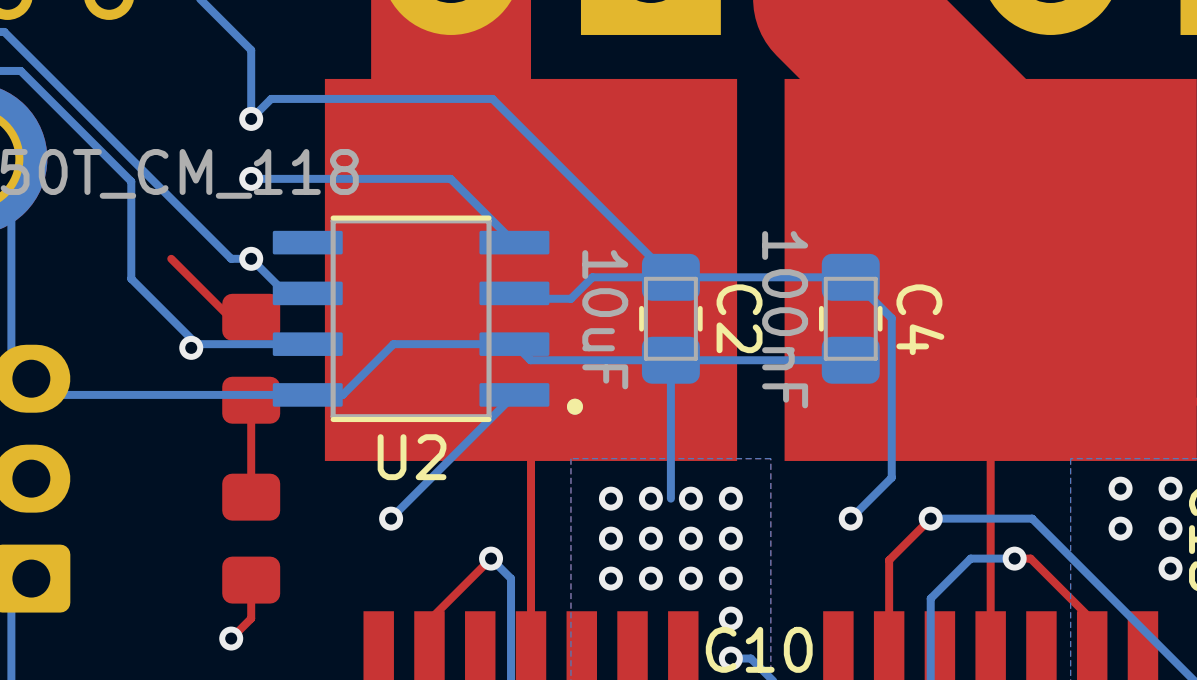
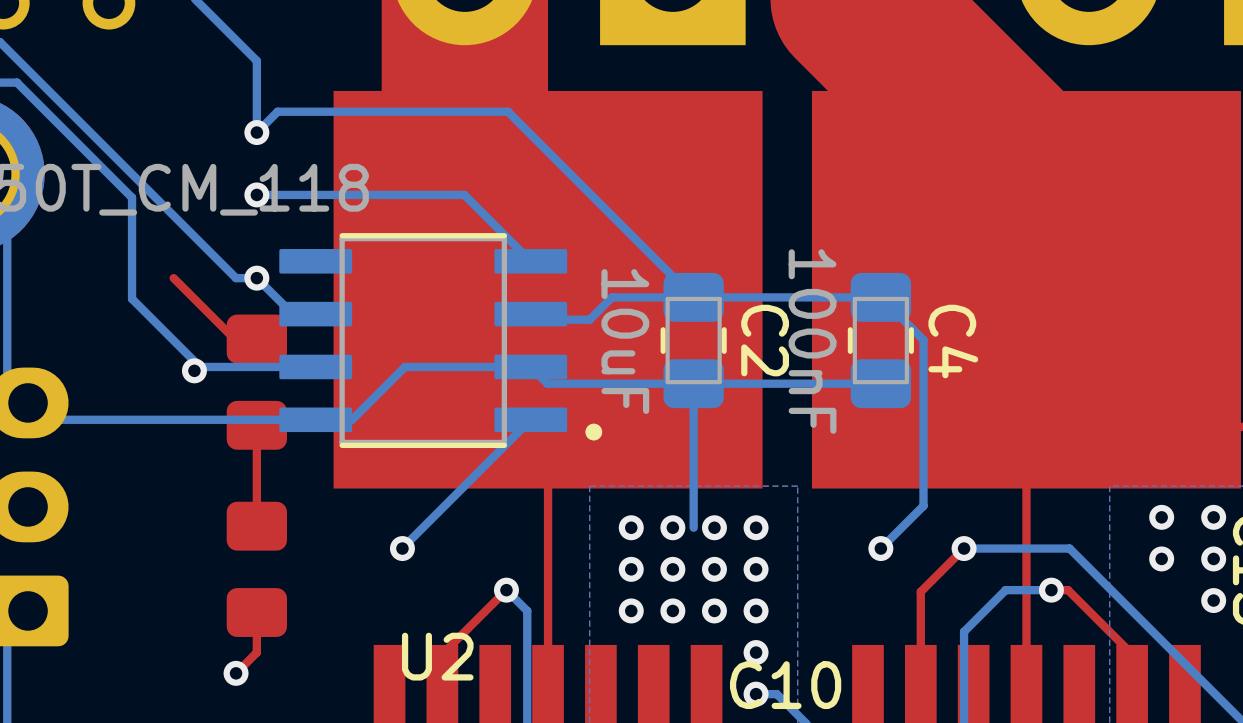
U2 name position: U2 (412, 457) -> U2 (437, 656)

